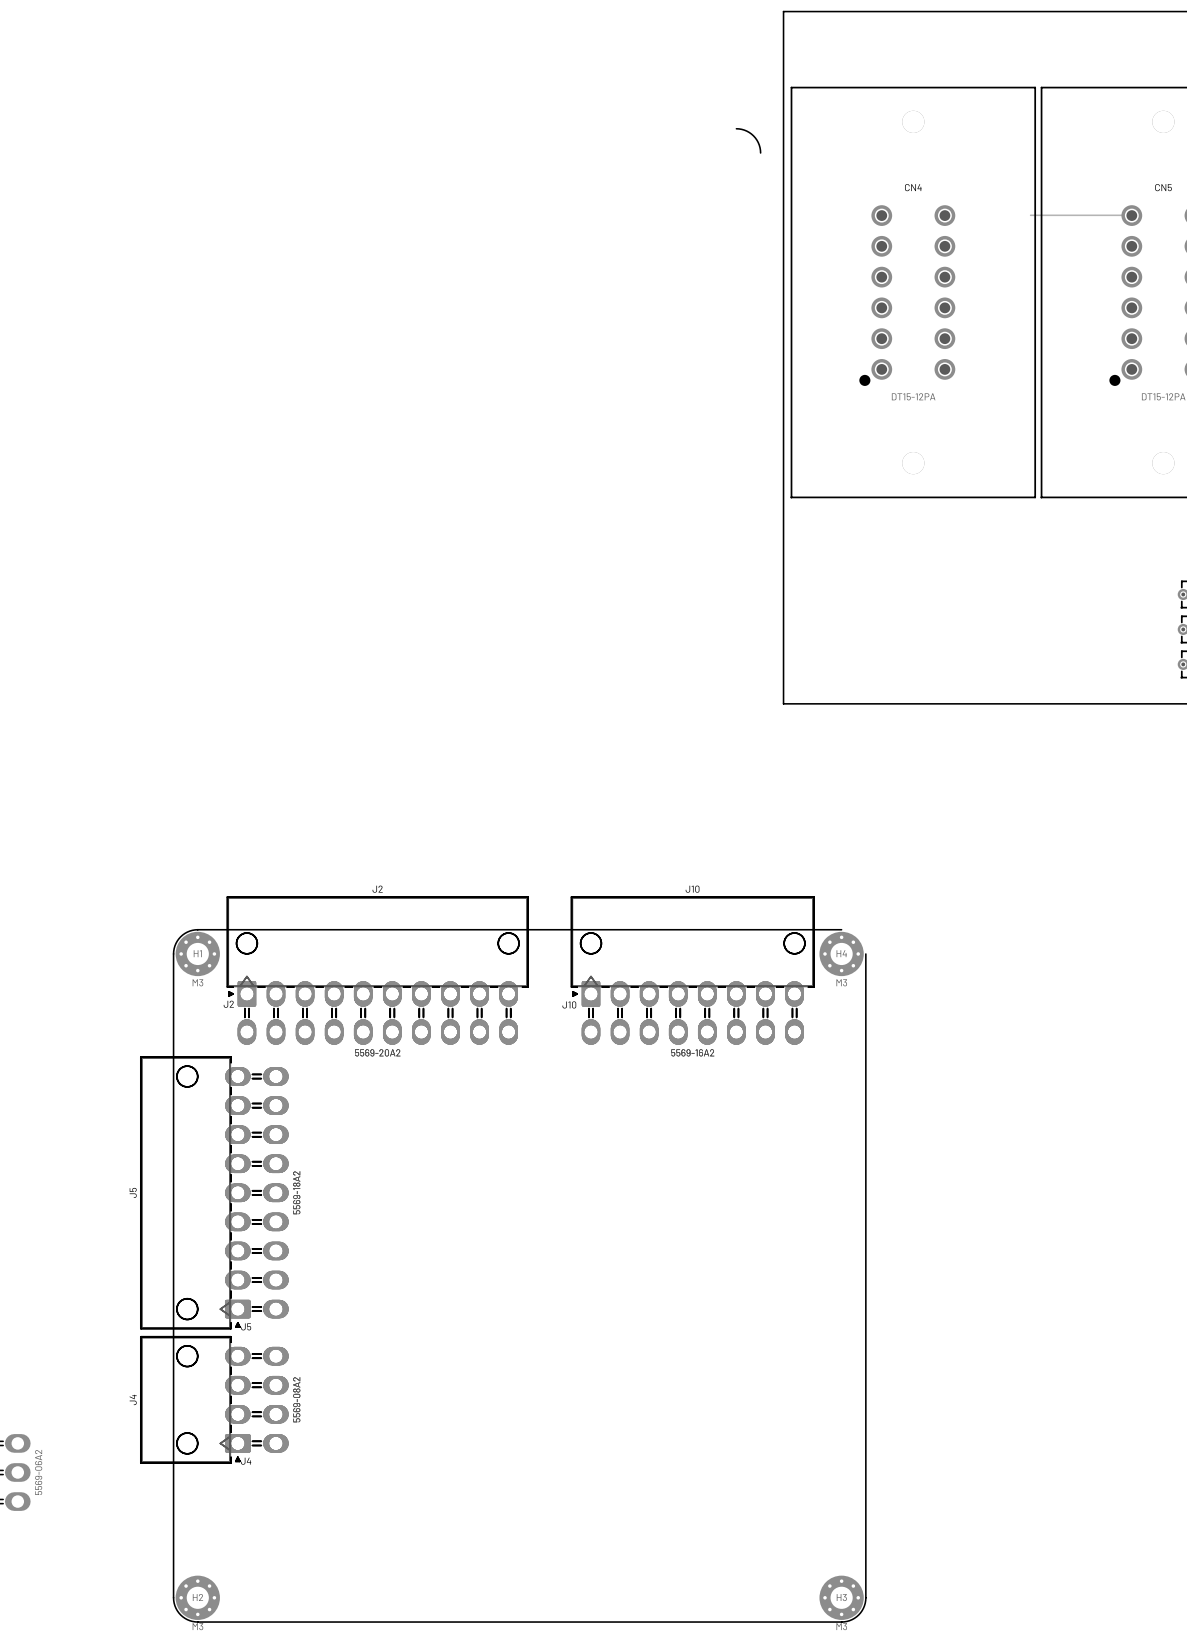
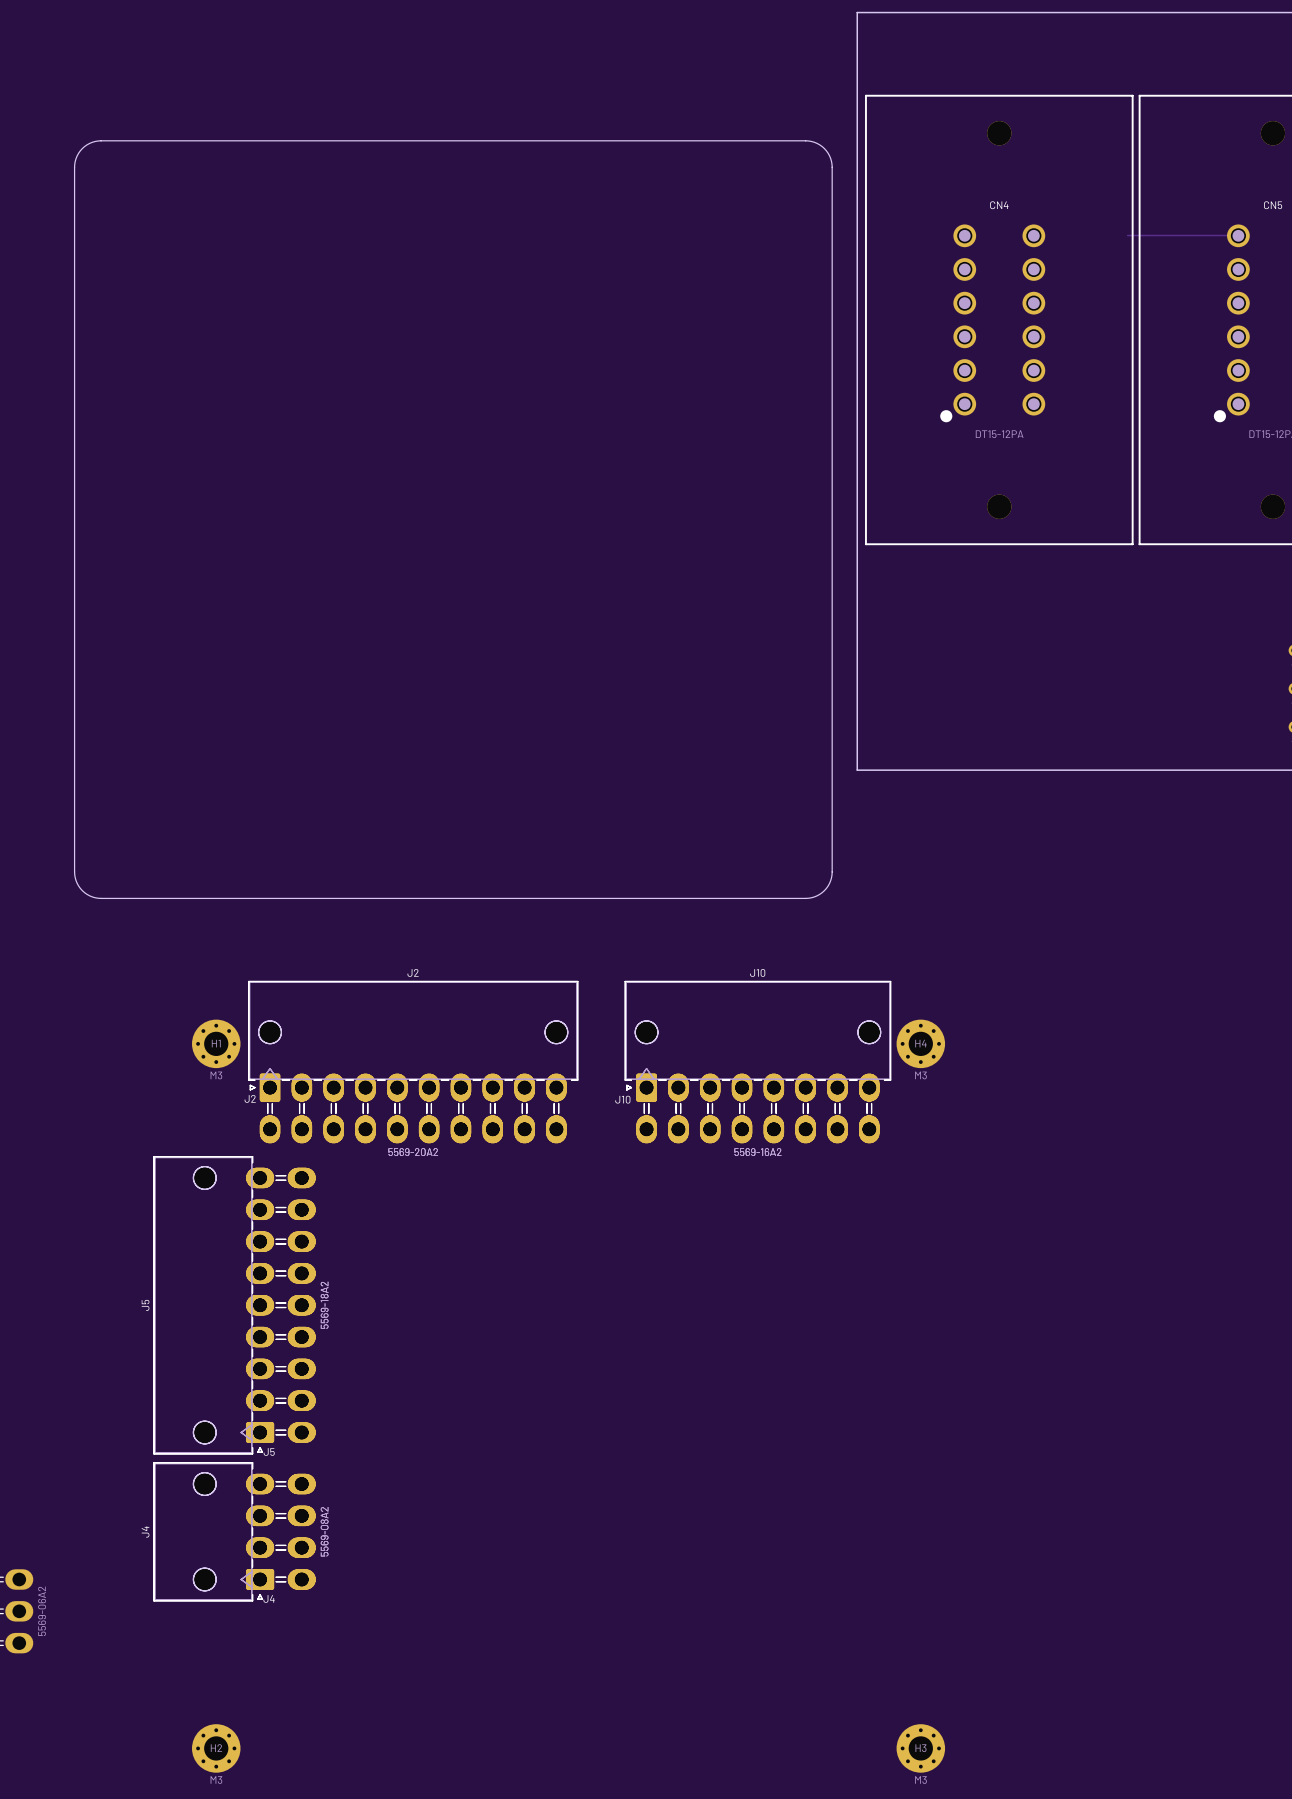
board edge: none -> (805, 140) (101, 140) (92, 142) (82, 148) (77, 155) (74, 167) (74, 871) (77, 883) (82, 890) (89, 895) (101, 898) (805, 898) (814, 896) (824, 890) (830, 880) (832, 871) (832, 167)
board edge: (841, 929) (197, 929) (189, 931) (180, 936) (174, 945) (173, 953) (173, 1597) (174, 1605) (180, 1614) (189, 1620) (197, 1622) (841, 1622) (852, 1619) (858, 1614) (864, 1605) (865, 1597) (865, 953) -> none

